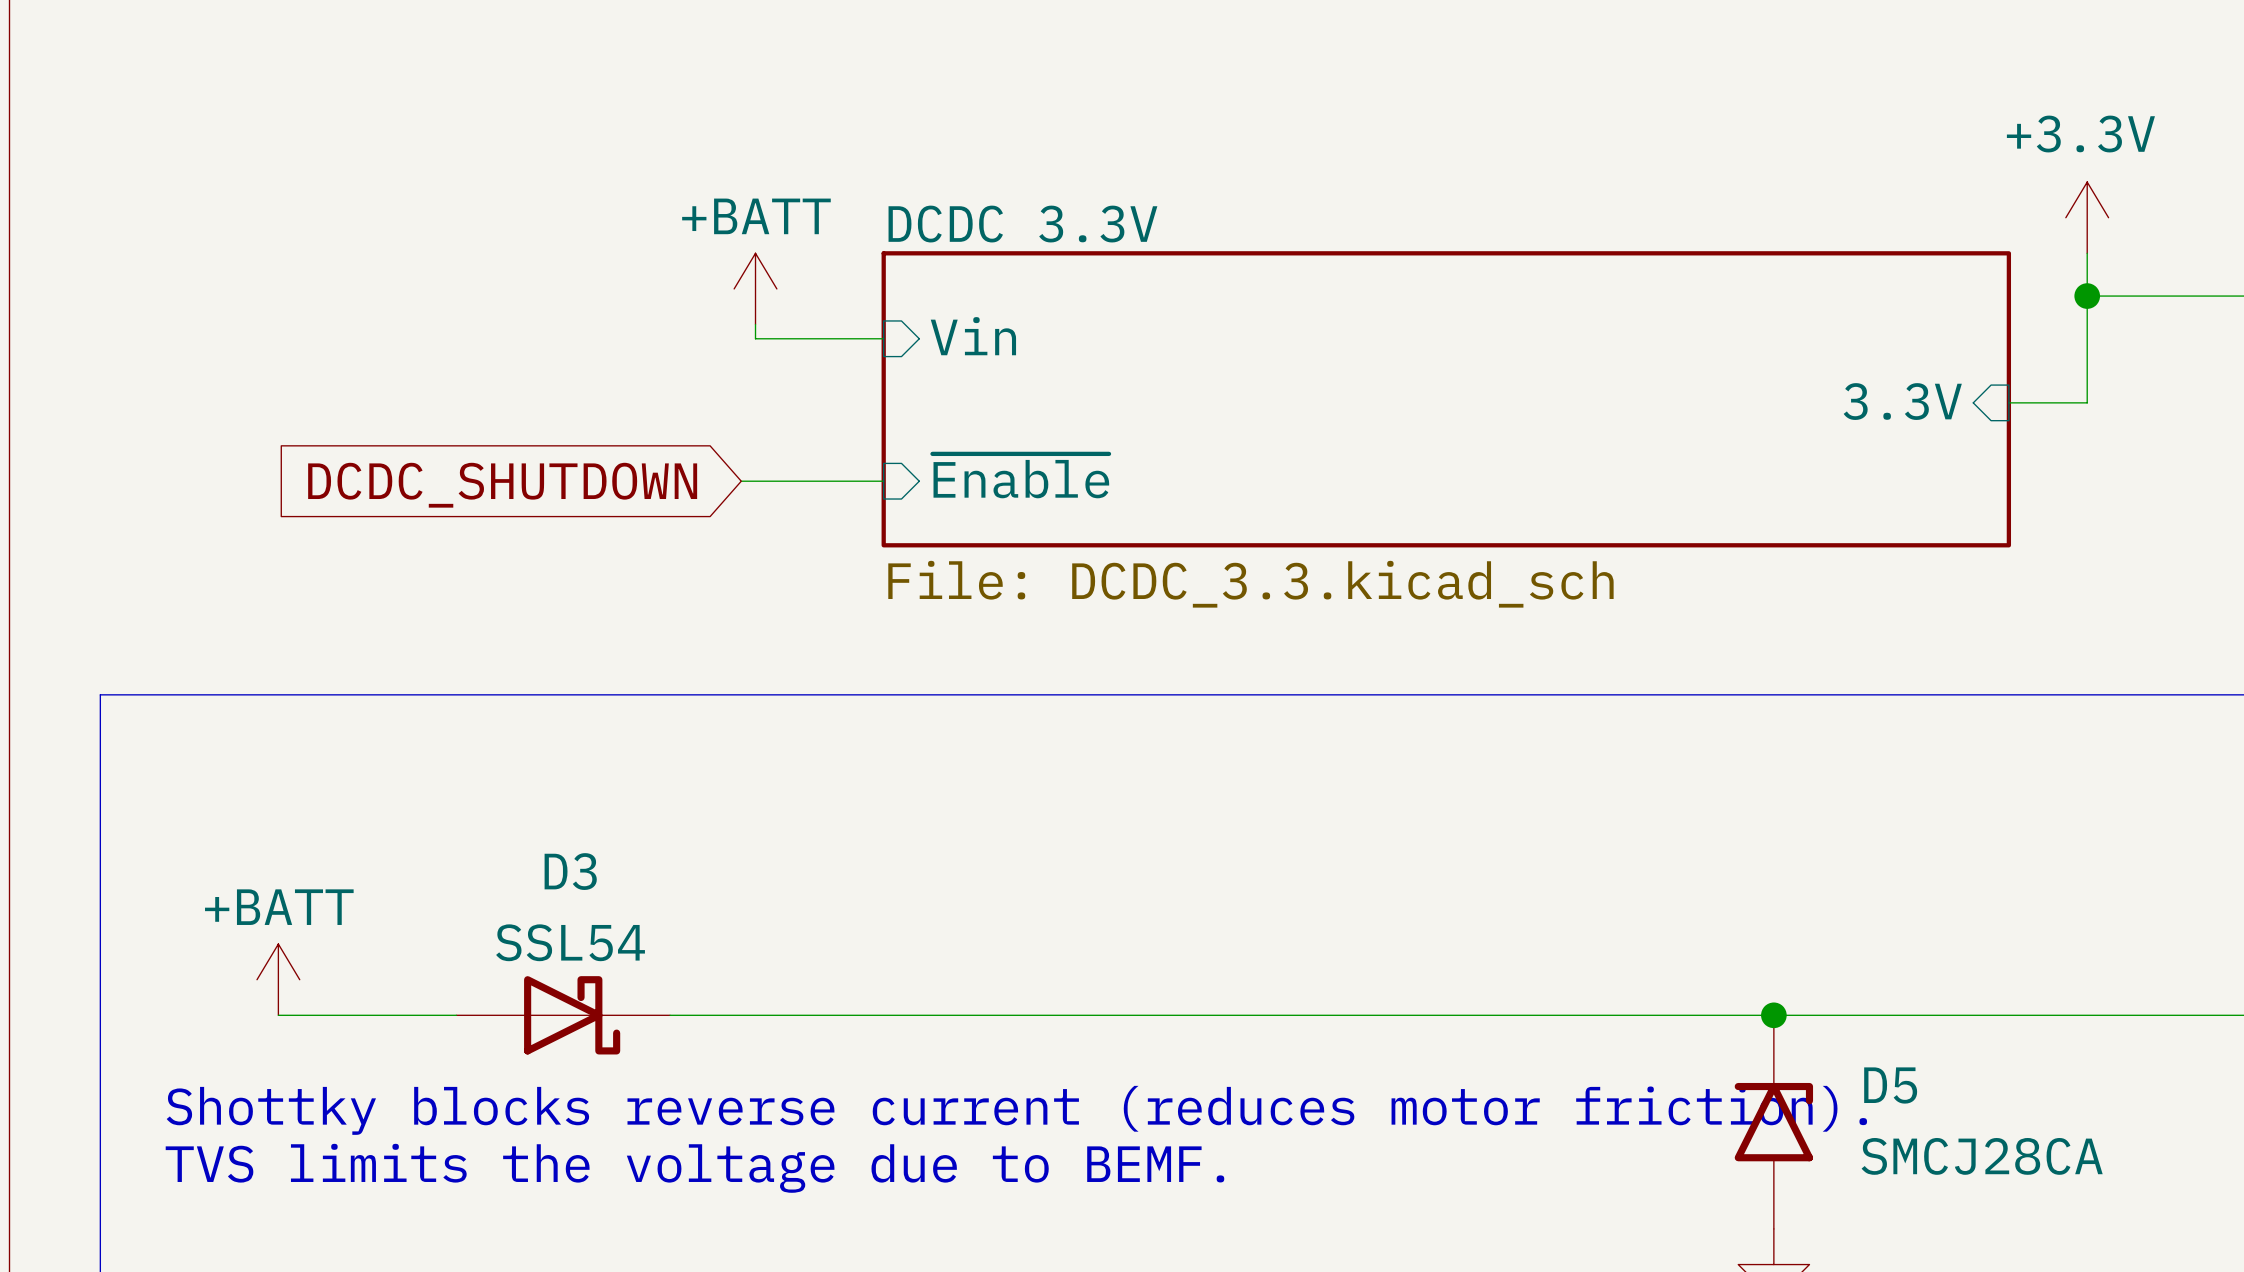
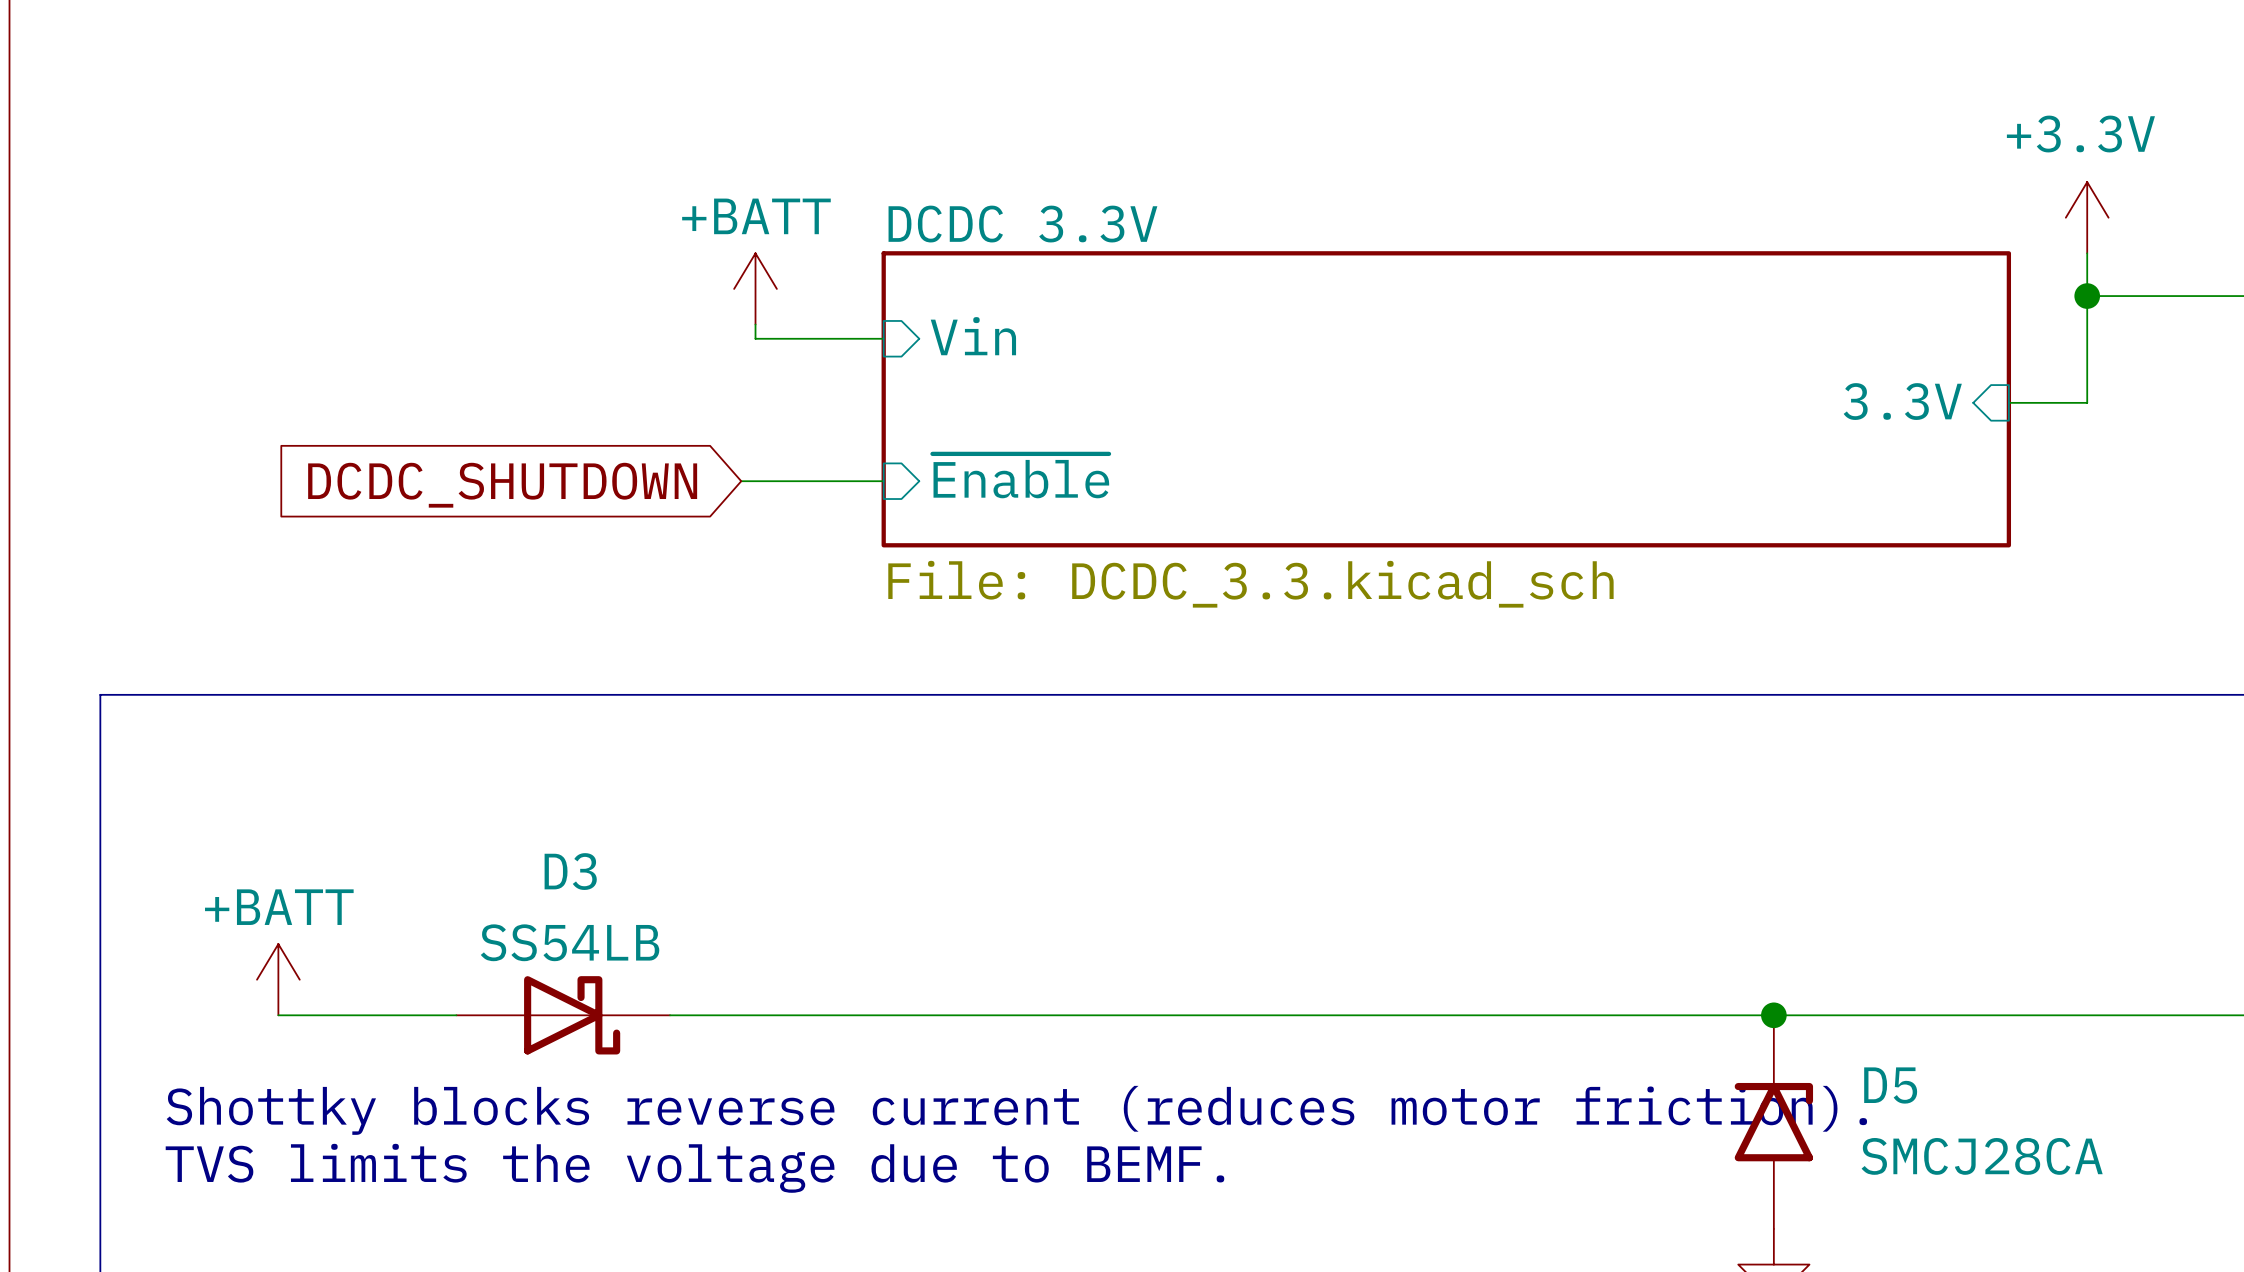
D3 value: SSL54 (570, 942) -> SS54LB (570, 942)

